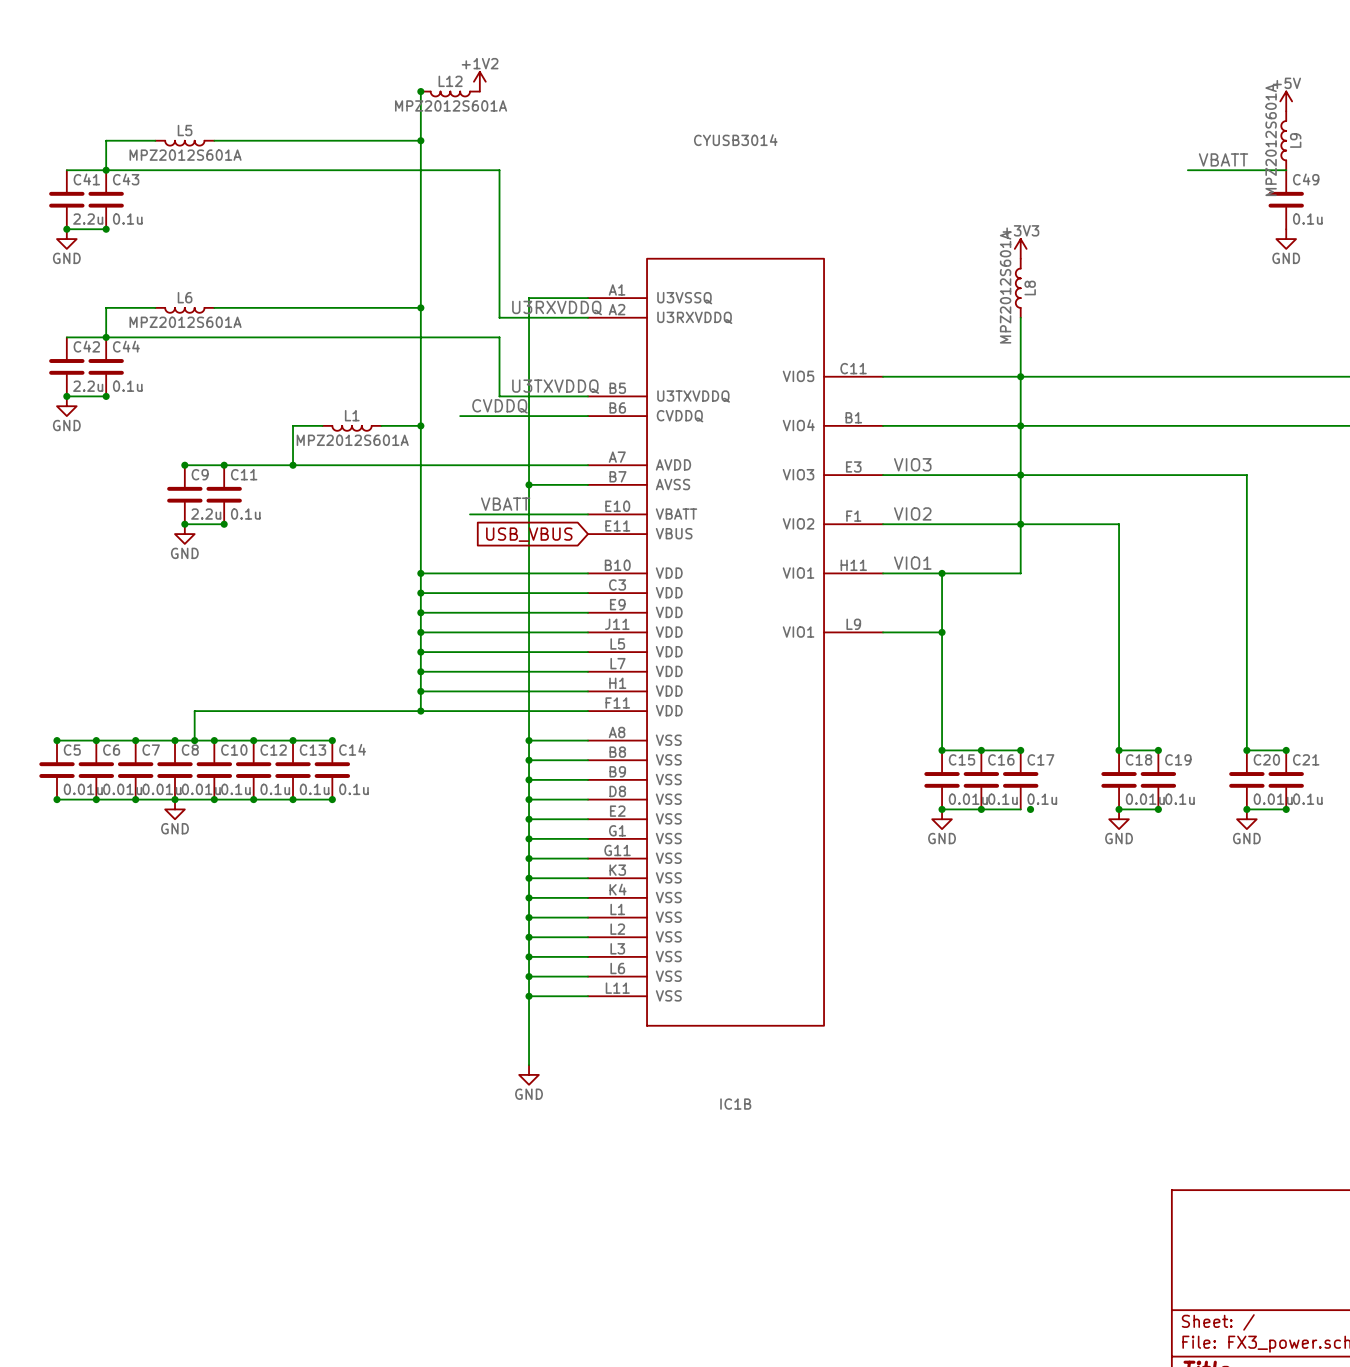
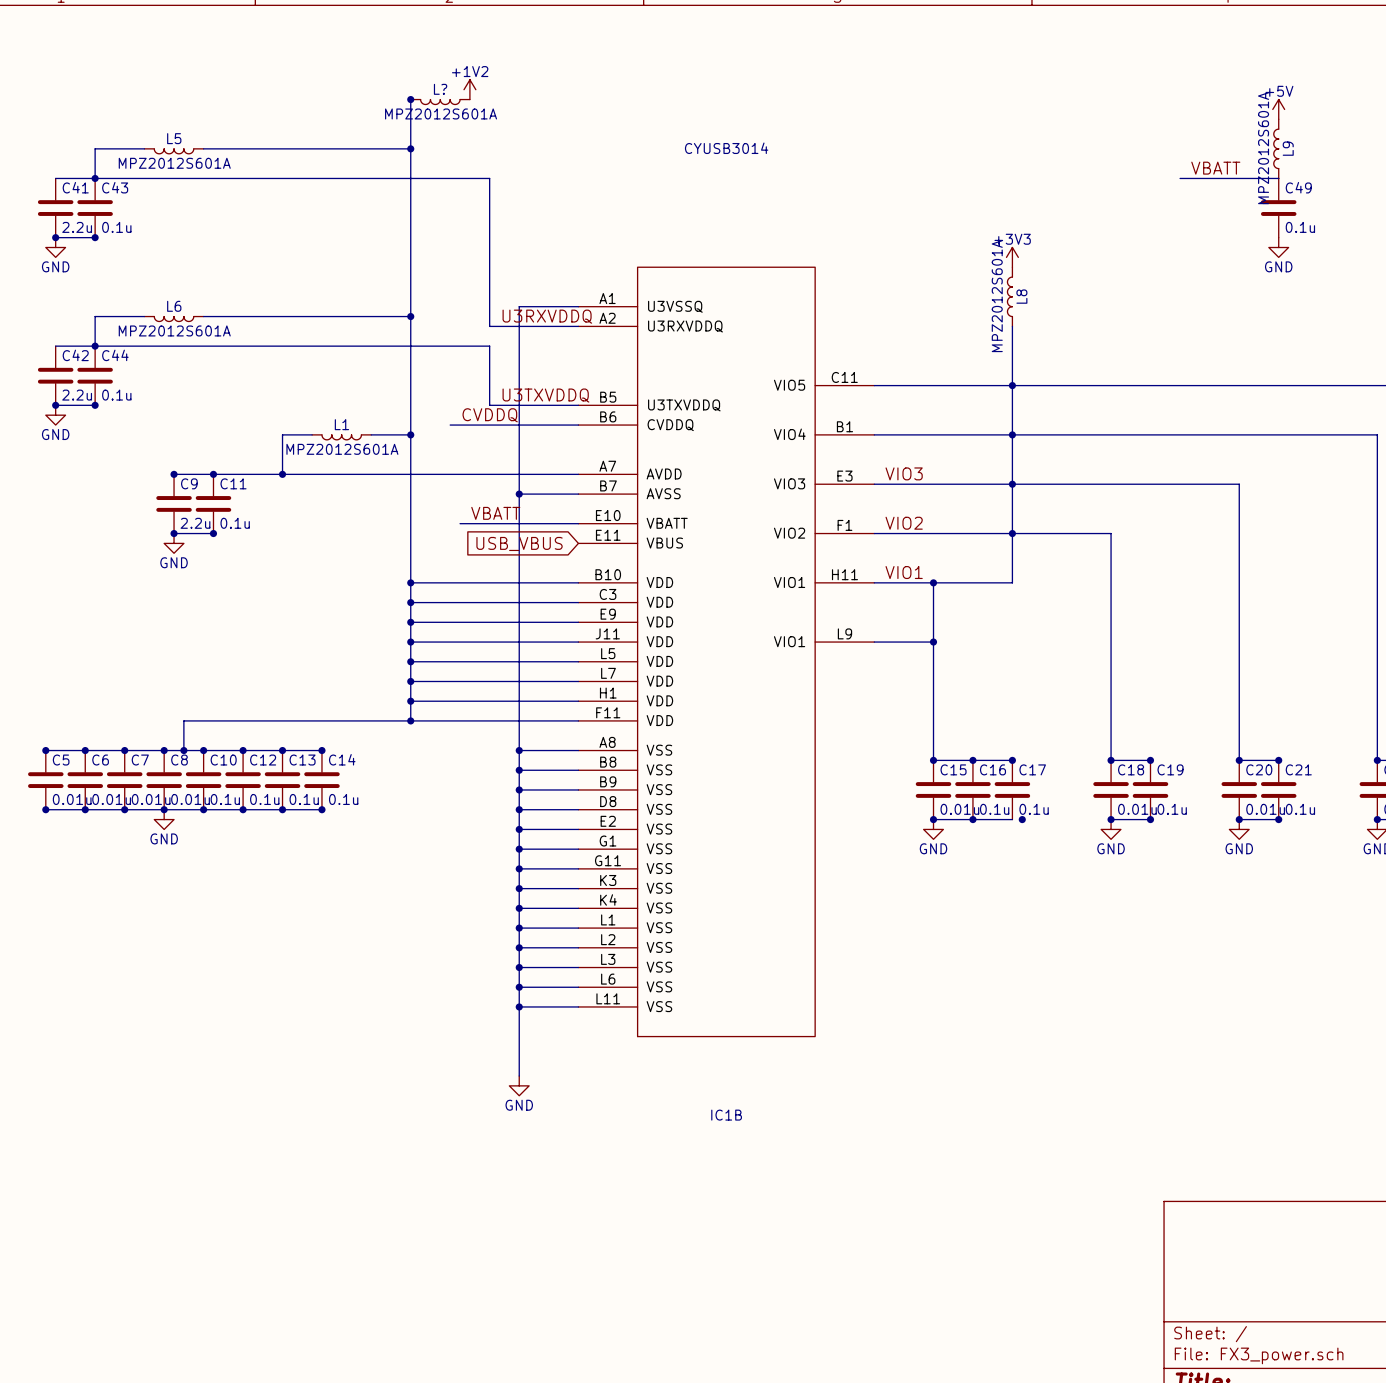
L12 name: L12 (450, 81) -> L? (440, 89)

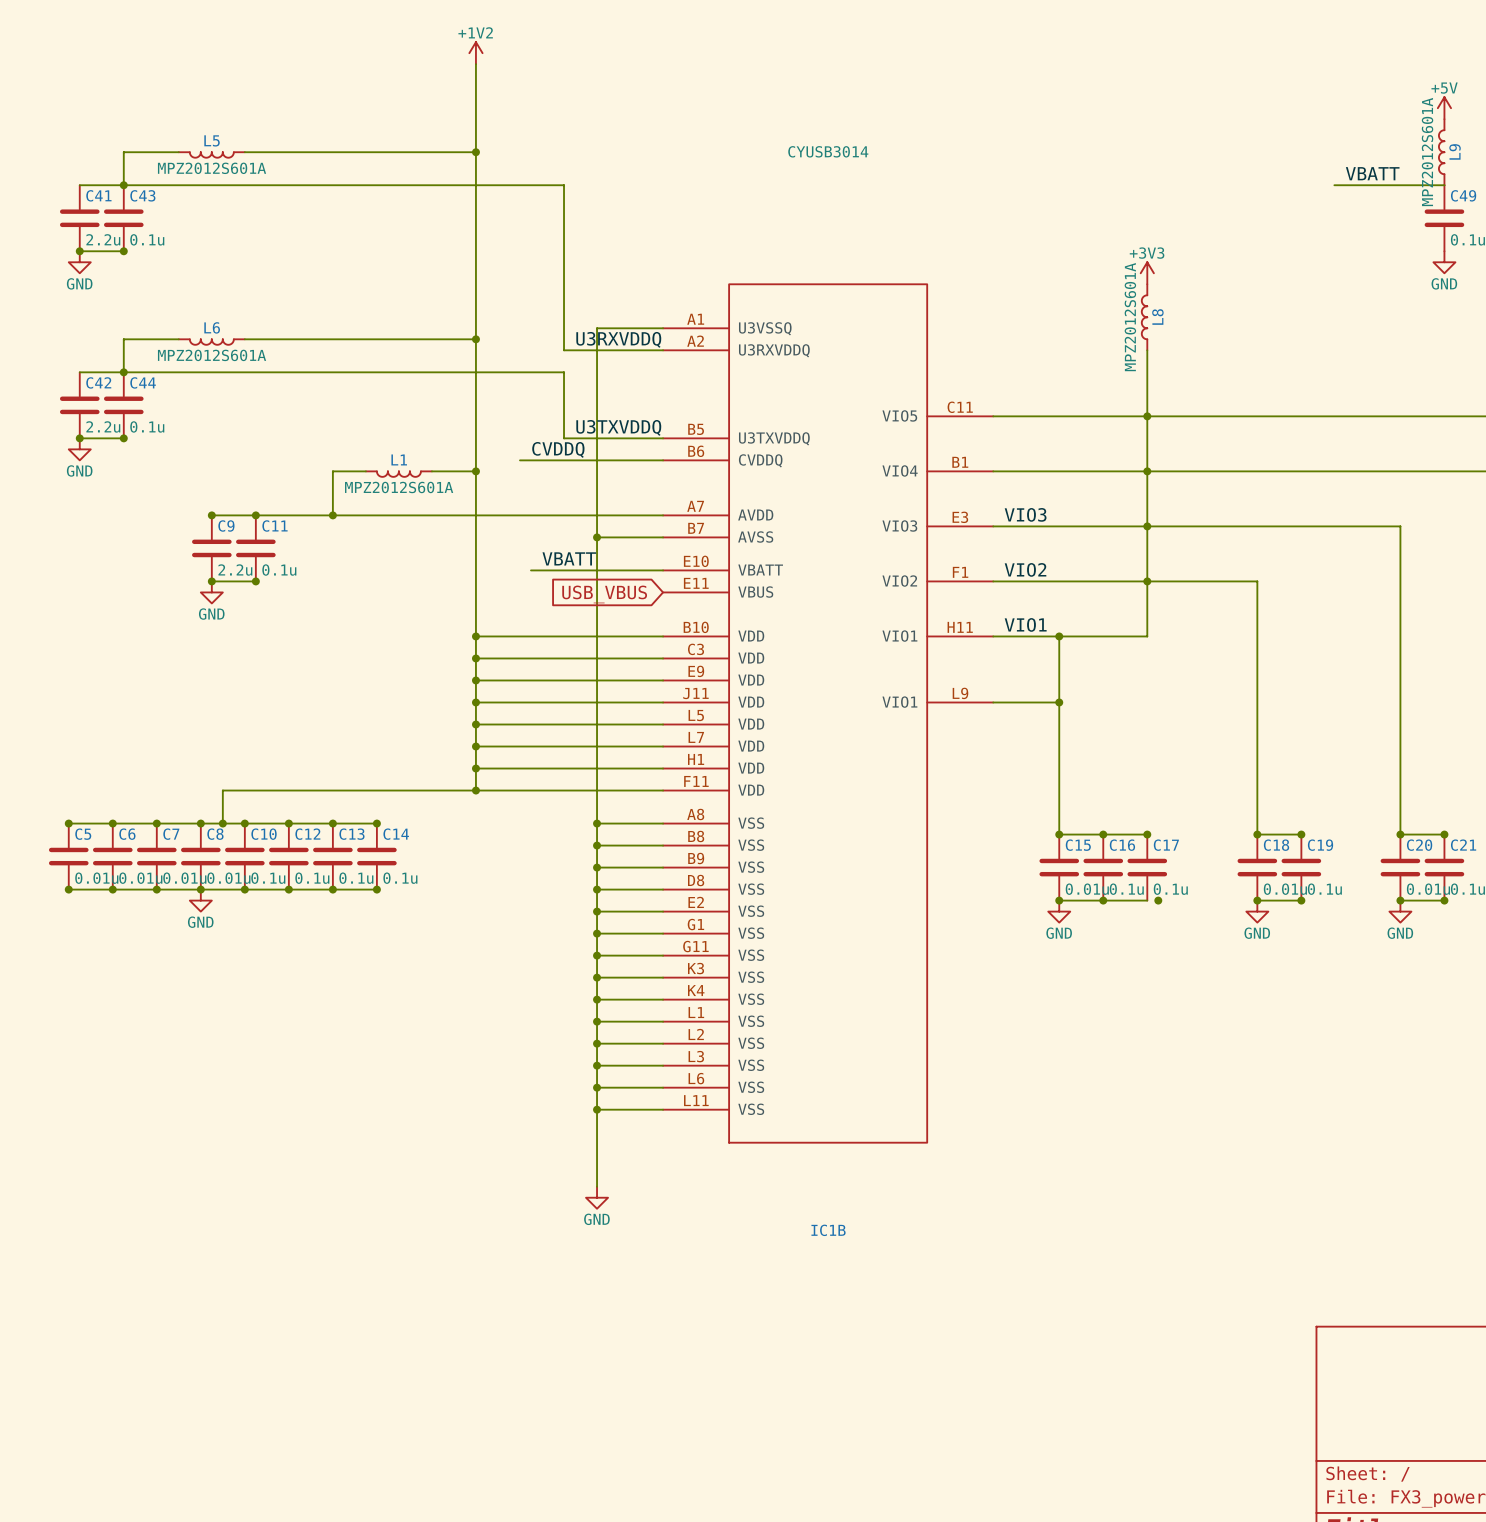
wire: none -> (475, 64) (475, 97)
power symbol position: +1V2 (469, 89) -> +1V2 (475, 53)
junction: (410, 99) -> none
L?: MPZ2012S601A (440, 102) -> none

